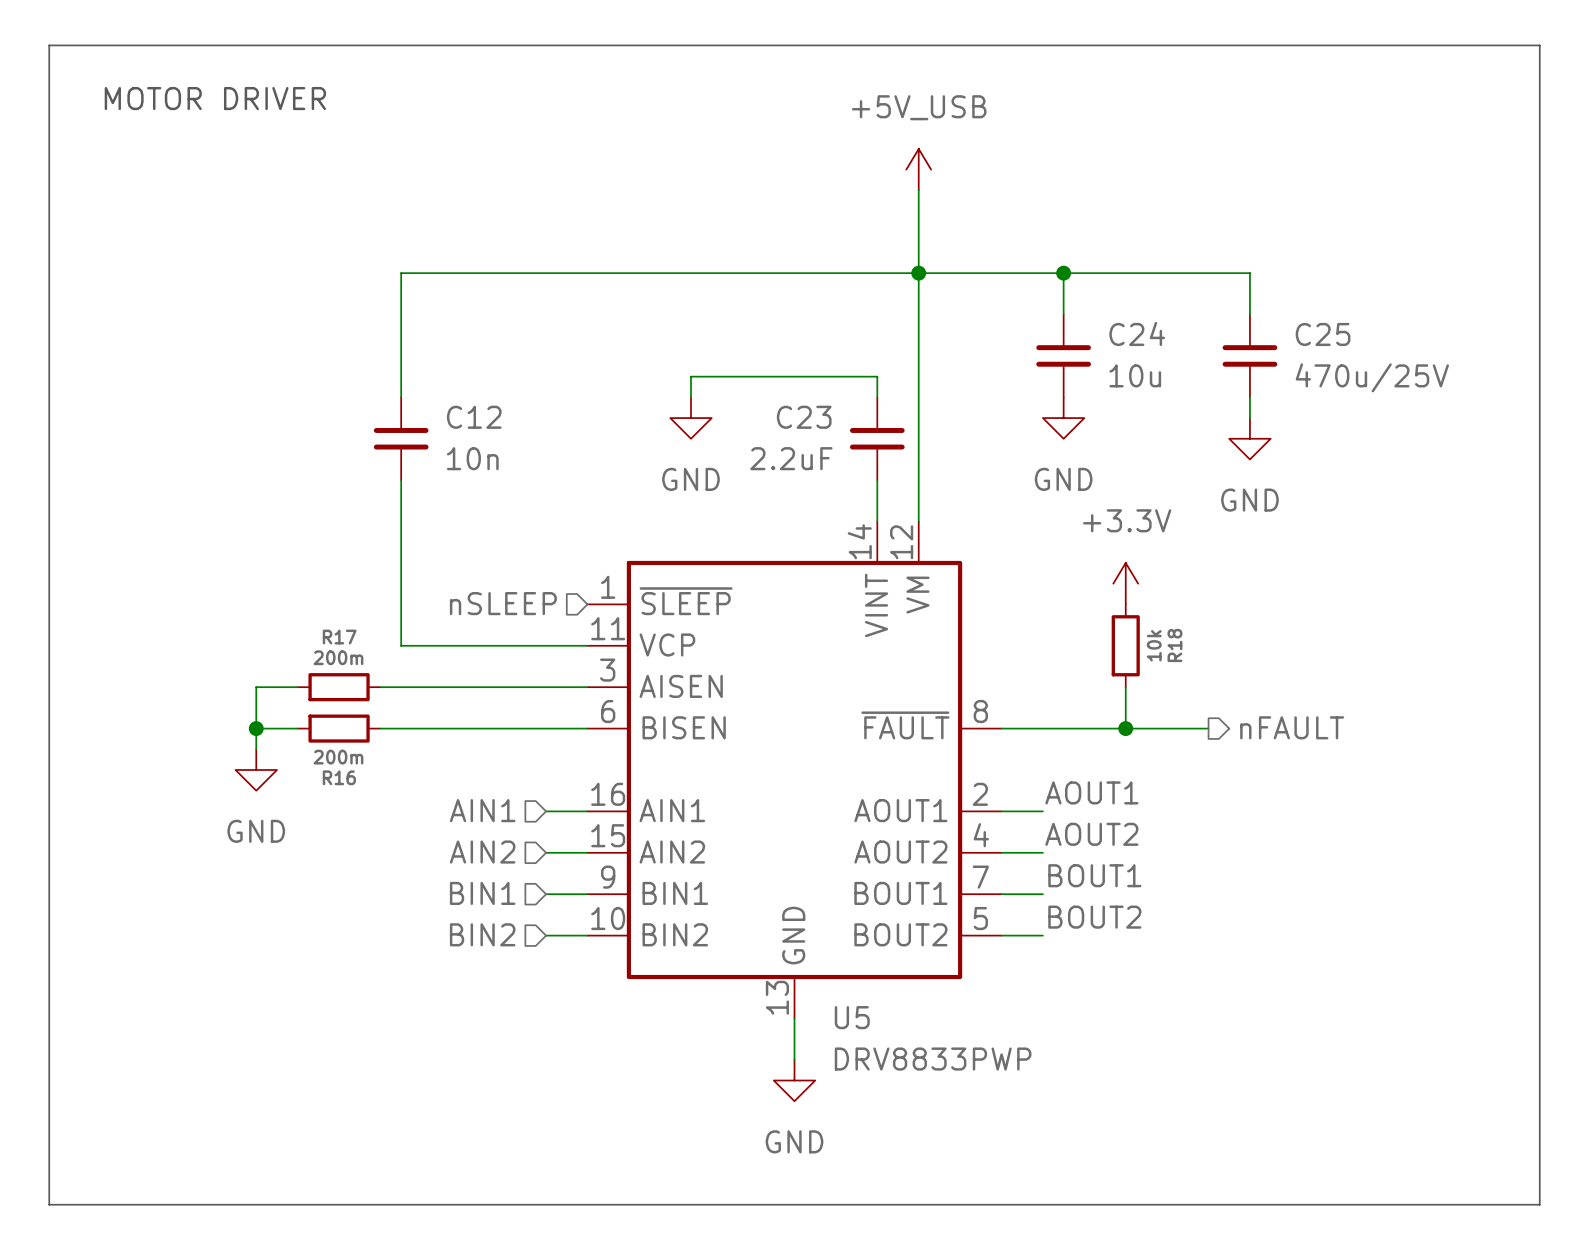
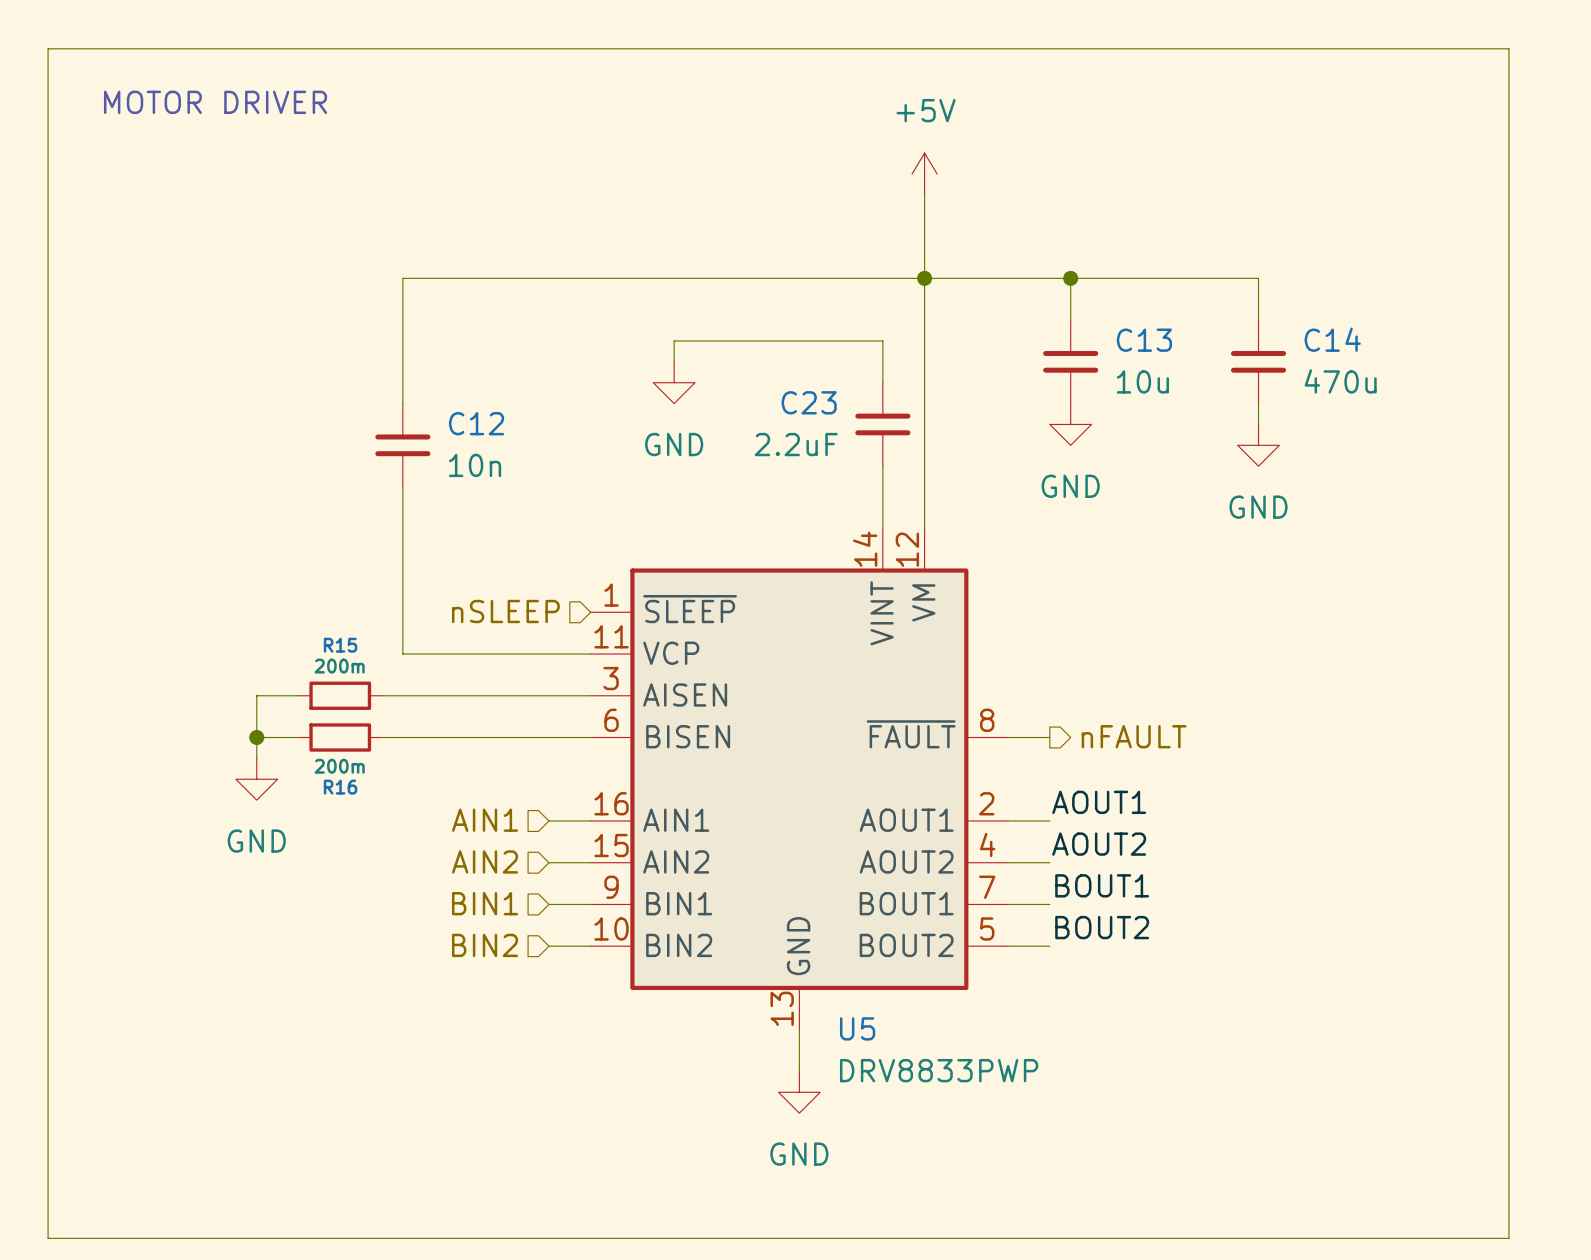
line: (49, 45) (1539, 45) (1539, 1204) (49, 1204) (49, 45) -> none
wire: none -> (48, 48) (1508, 48) (1508, 1238) (48, 1238) (48, 48)
power symbol: +5V_USB (918, 169) -> +5V (924, 174)
C24 name: C24 (1137, 333) -> C13 (1144, 340)
C25 name: C25 (1323, 334) -> C14 (1332, 339)
wire: none -> (674, 361) (674, 340) (882, 340) (882, 382)
C25 value: 470u/25V (1372, 377) -> 470u (1340, 381)
wire: (690, 397) (690, 376) (877, 376) (877, 397) -> none
power symbol position: GND (690, 418) -> GND (674, 382)
C23 position: (877, 438) -> (882, 424)
power symbol: +3.3V (1125, 583) -> none
R17 name: R17 (339, 637) -> R15 (340, 645)
R18: 10k (1125, 645) -> none
wire: (1125, 687) (1125, 728) -> none
hierarchical label position: nFAULT (1292, 727) -> nFAULT (1134, 736)
wire: (1042, 728) (1208, 728) -> none
junction: (1125, 728) -> none

